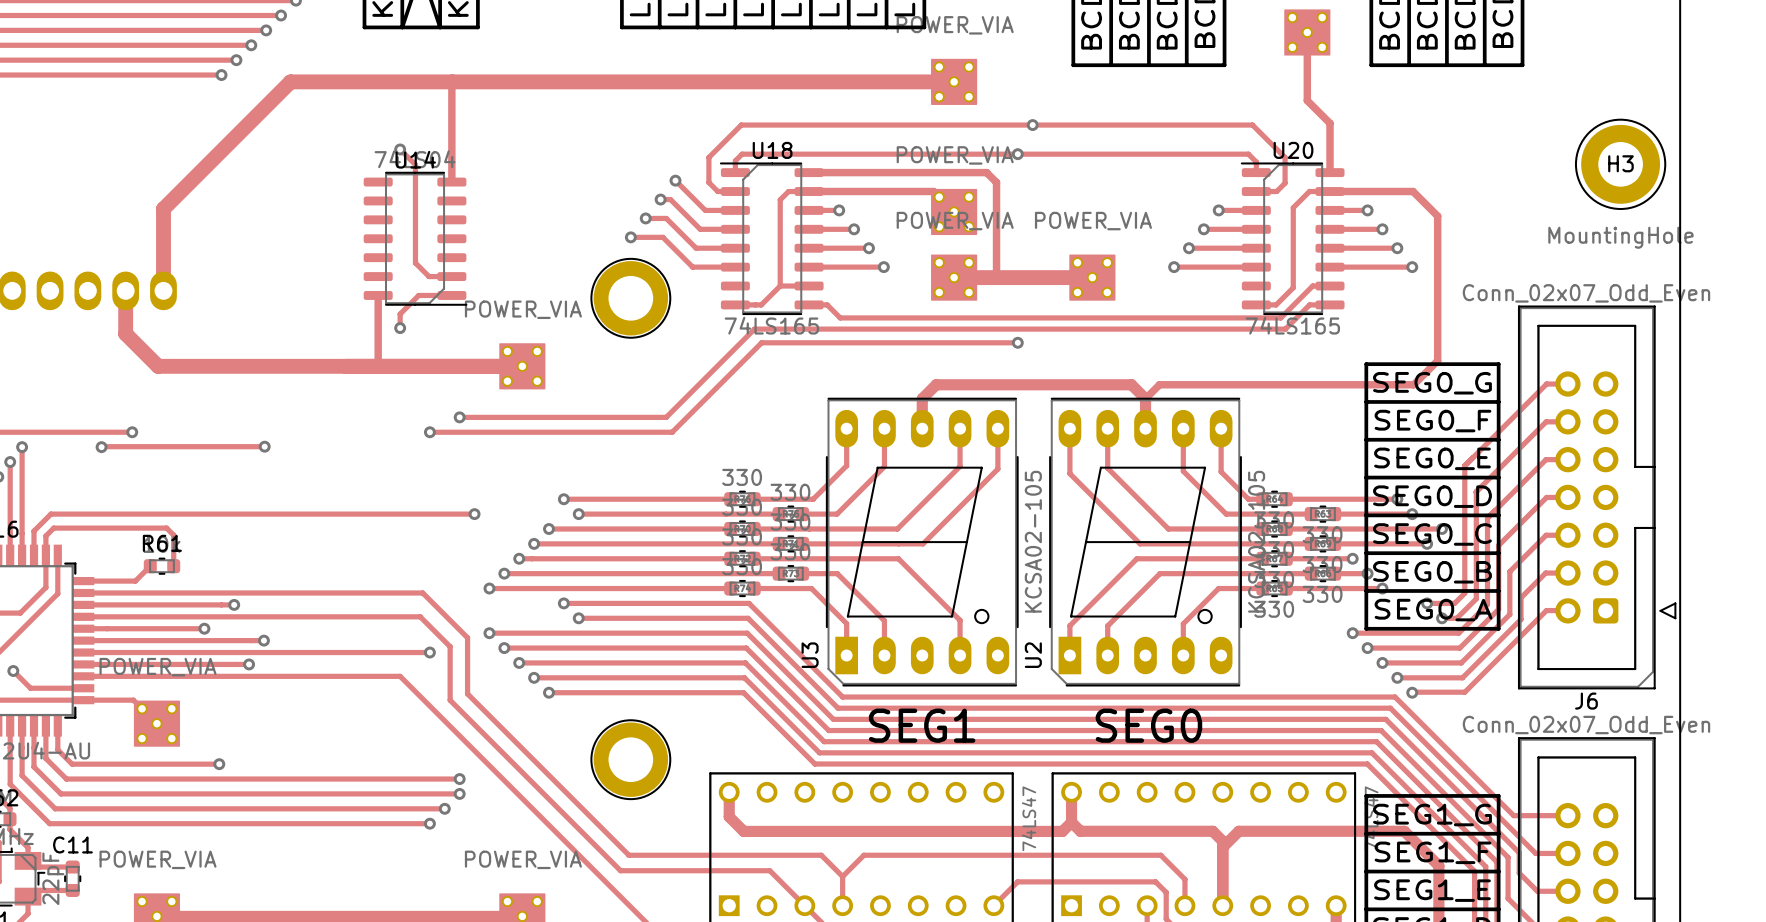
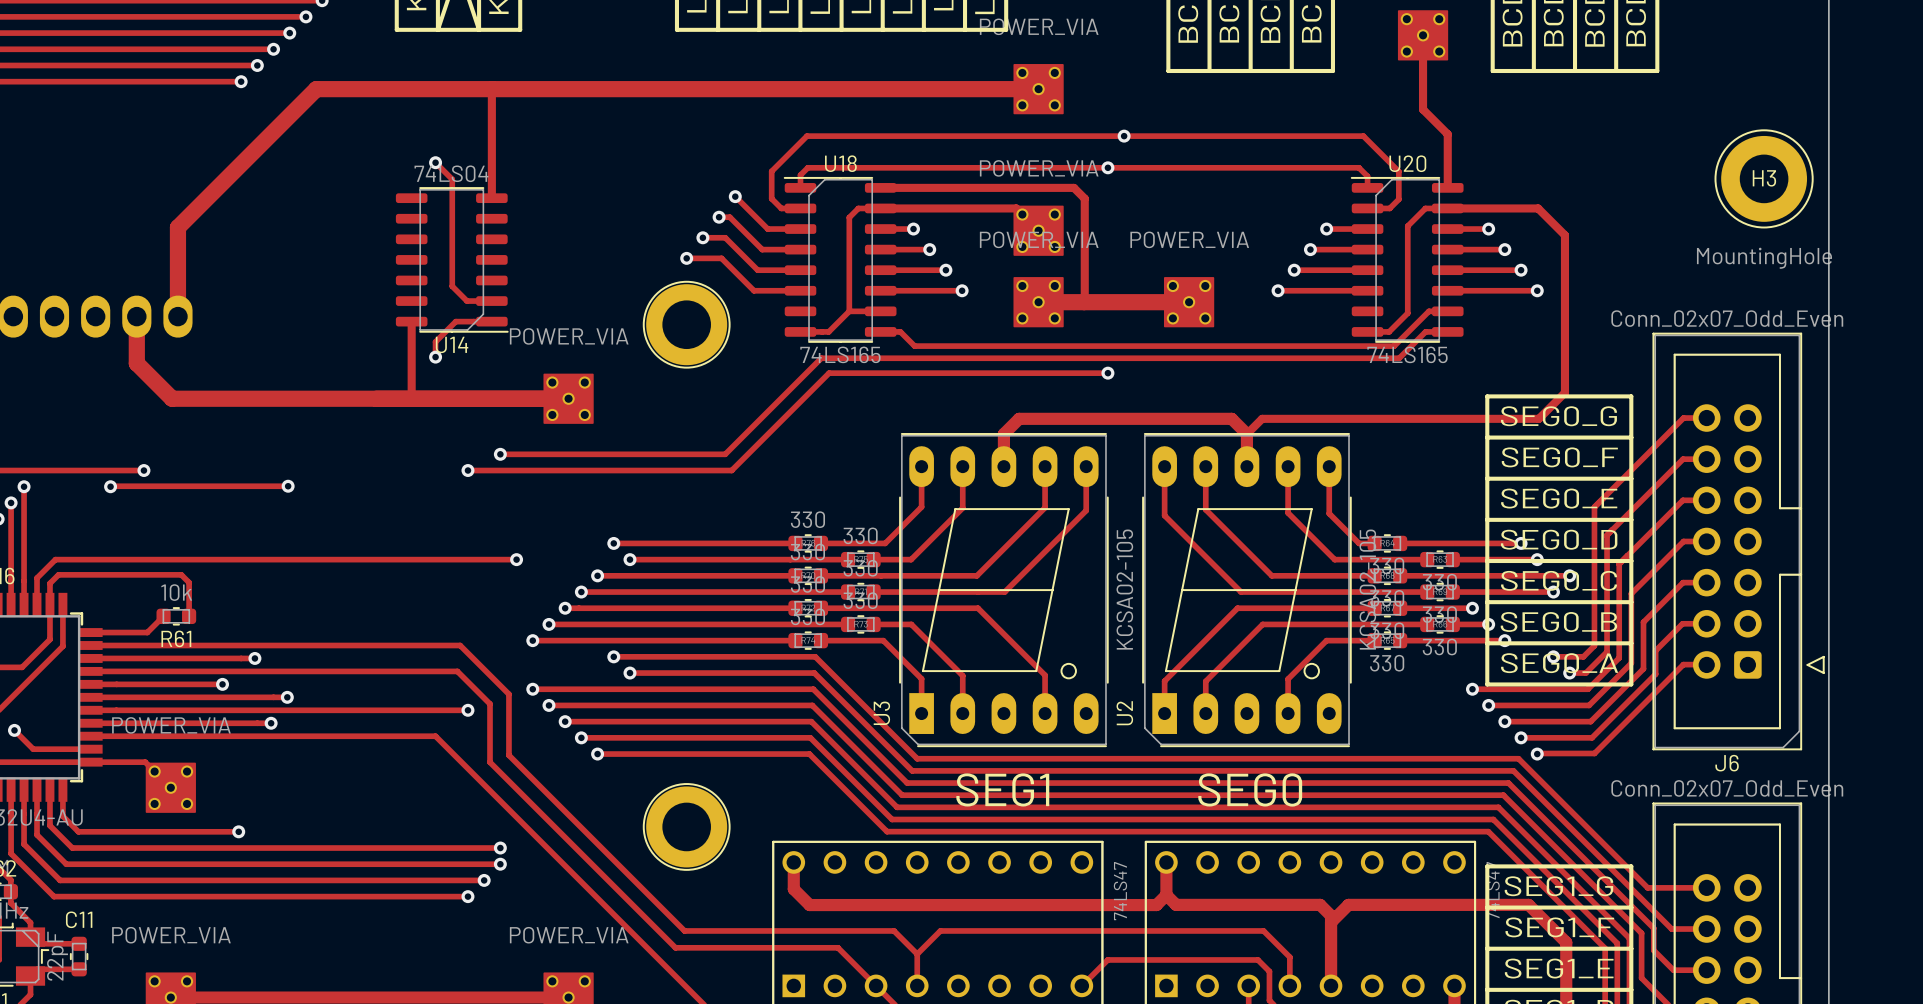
U14 name position: U14 (415, 159) -> U14 (452, 344)
R61 name position: R61 (162, 543) -> R61 (176, 638)

